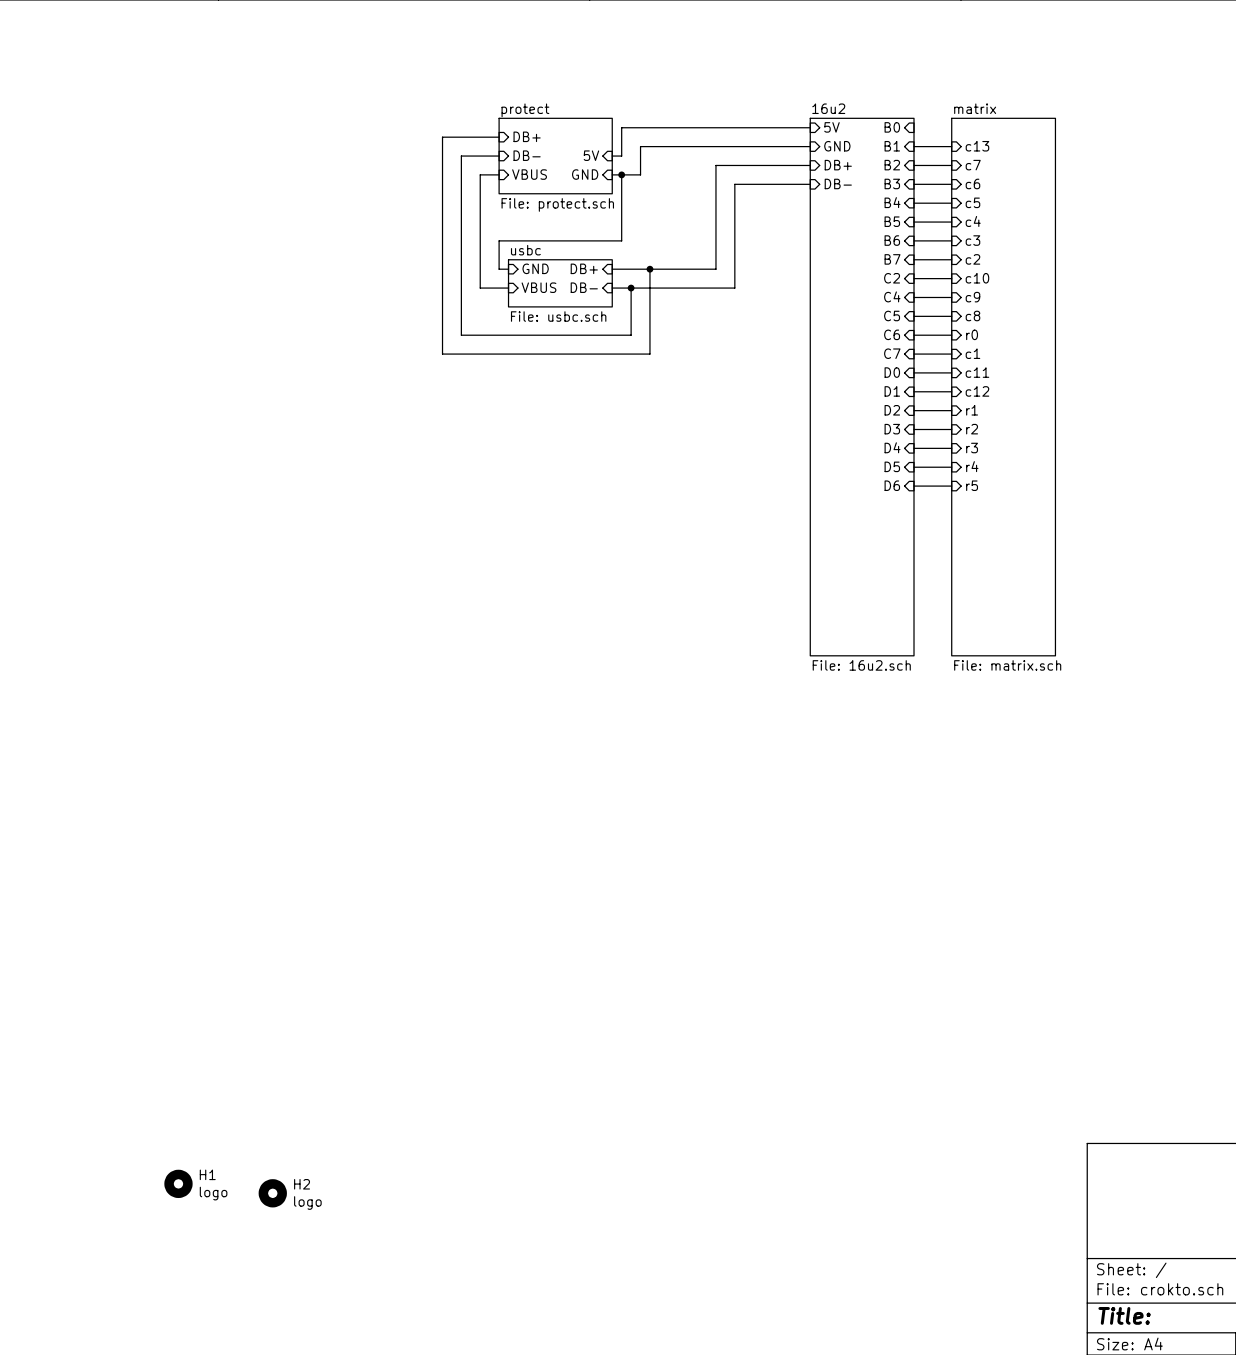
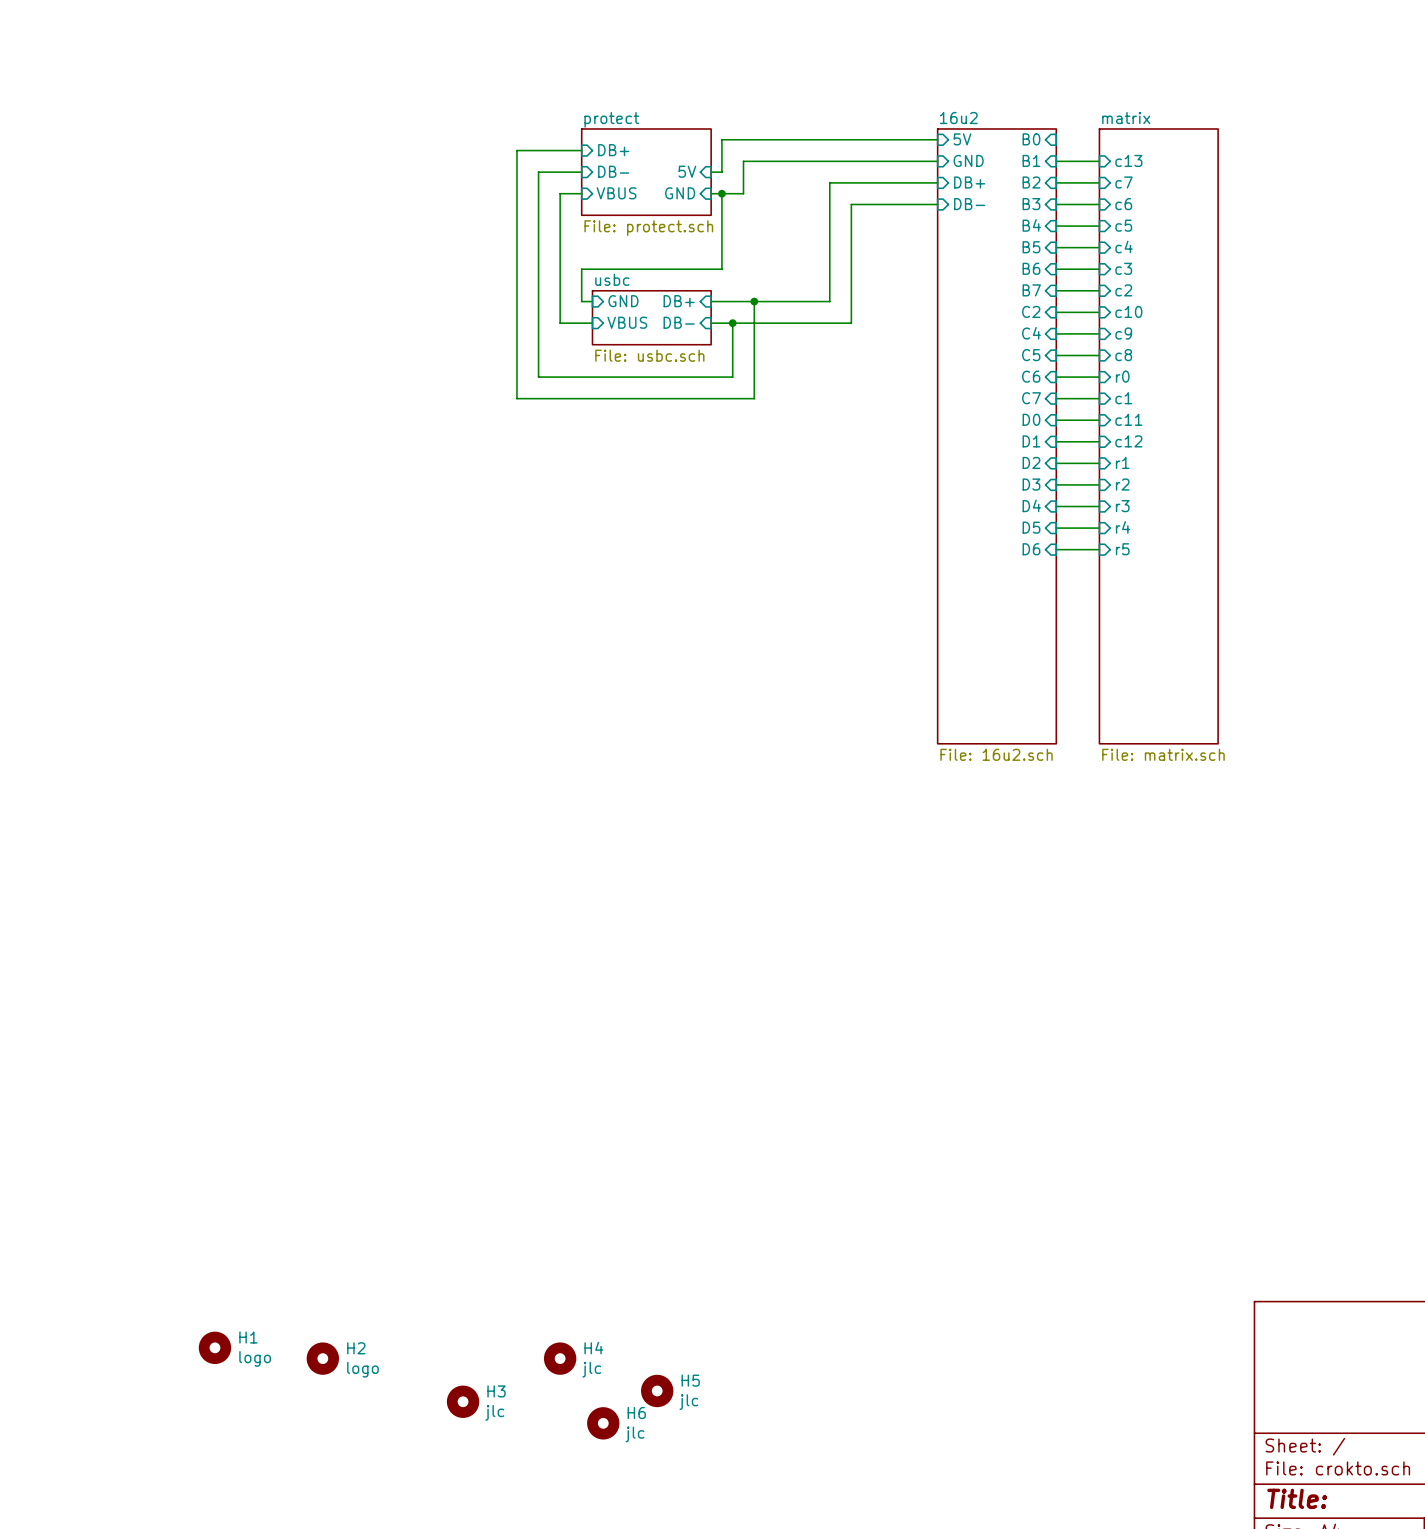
H4: none -> jlc (560, 1358)
H5: none -> jlc (657, 1390)
H3: none -> jlc (463, 1401)
H6: none -> jlc (603, 1423)

